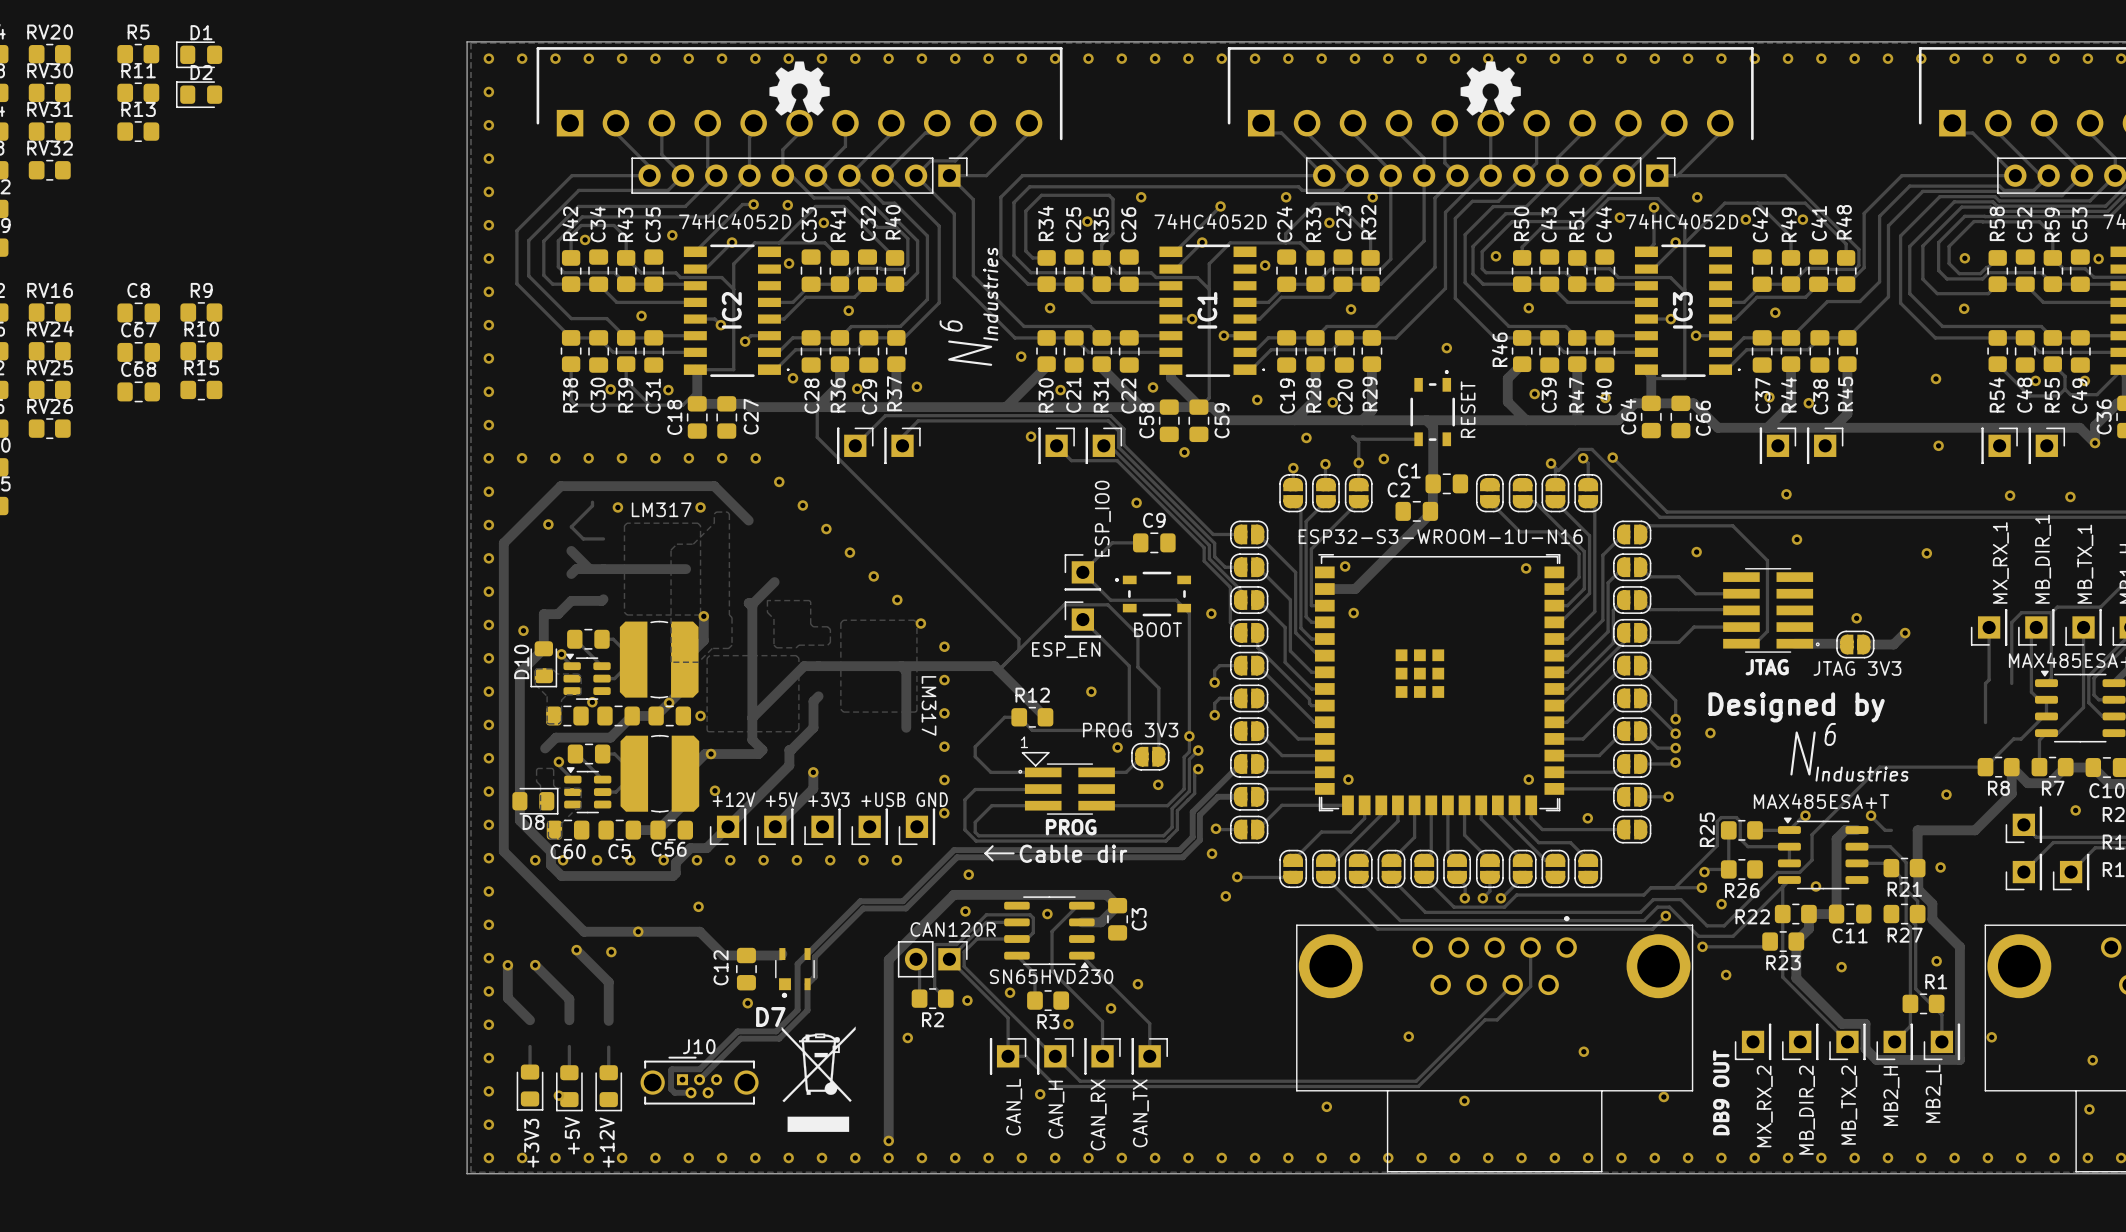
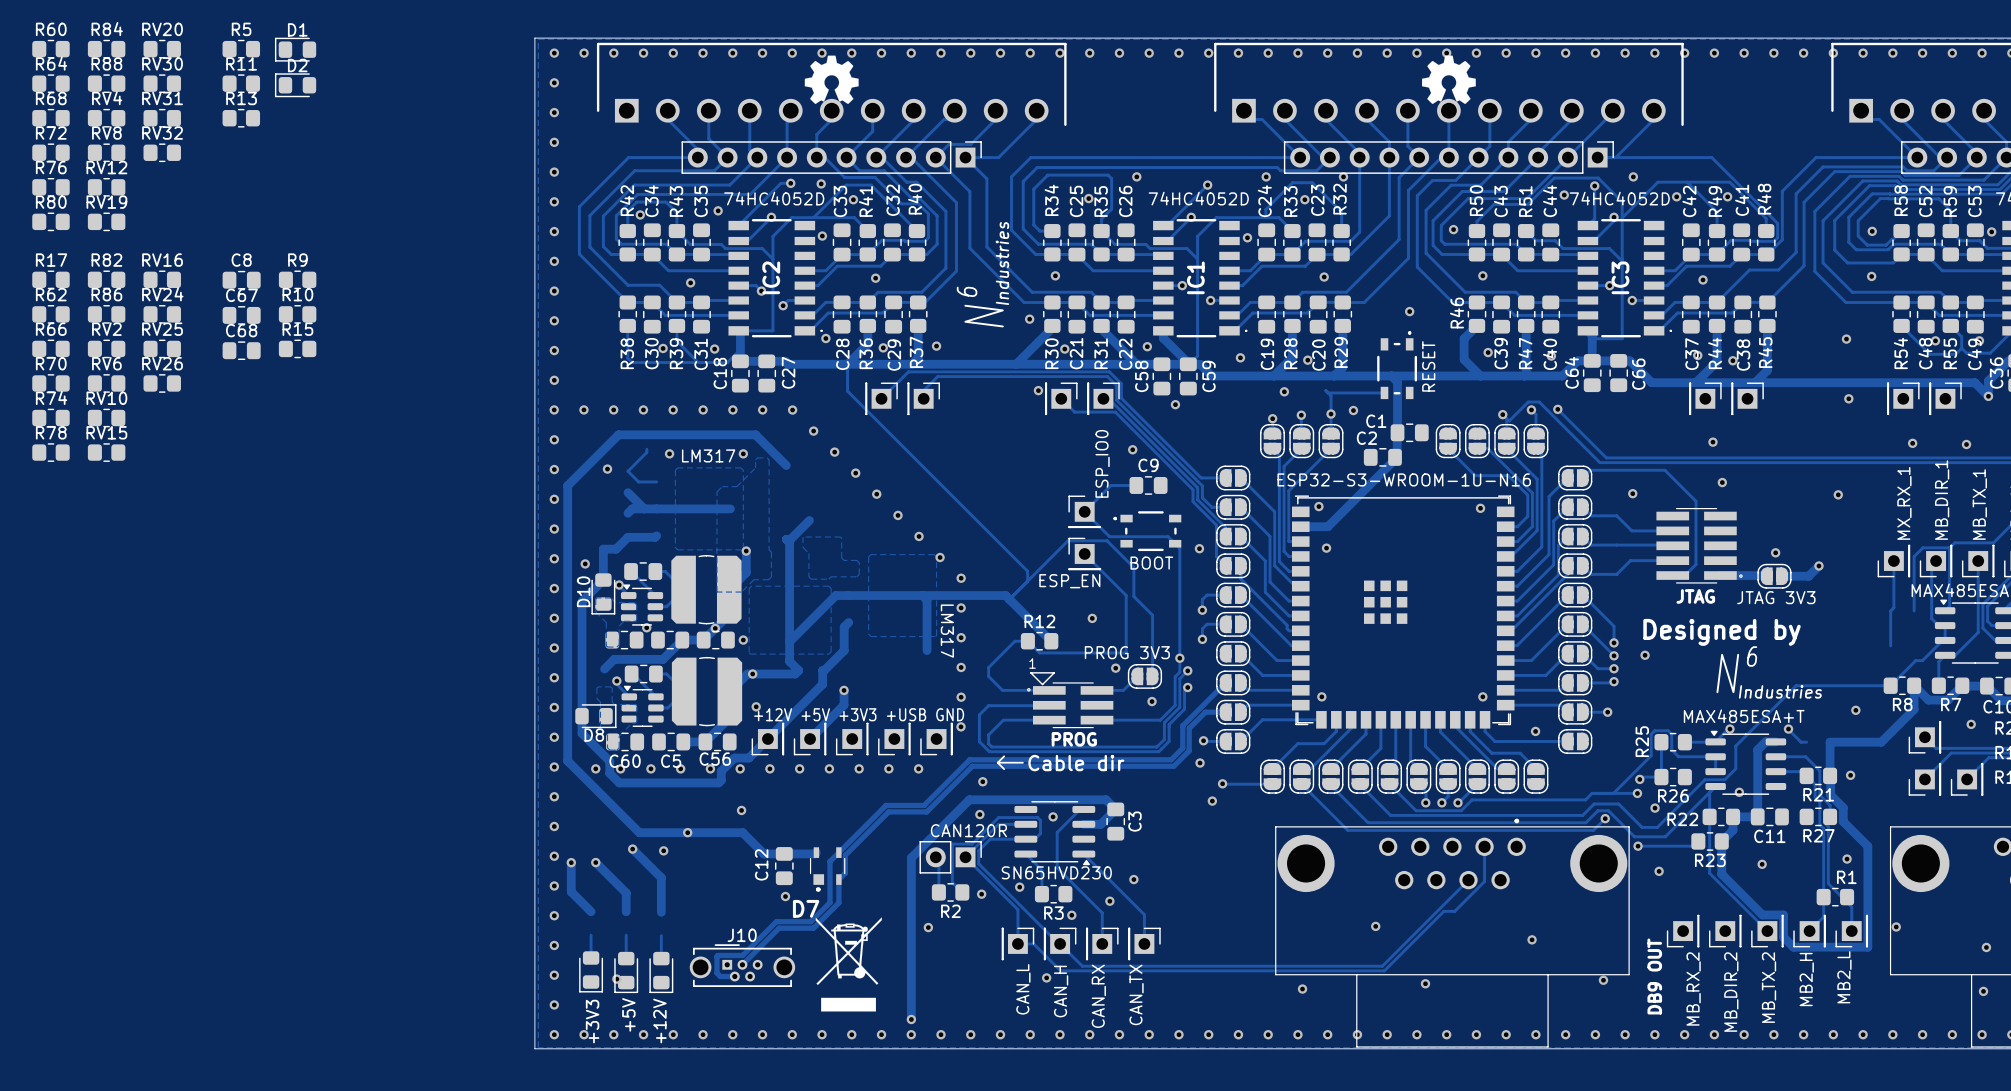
text: MX_RX_2 (1764, 1106) -> MB_RX_2 (1693, 988)

